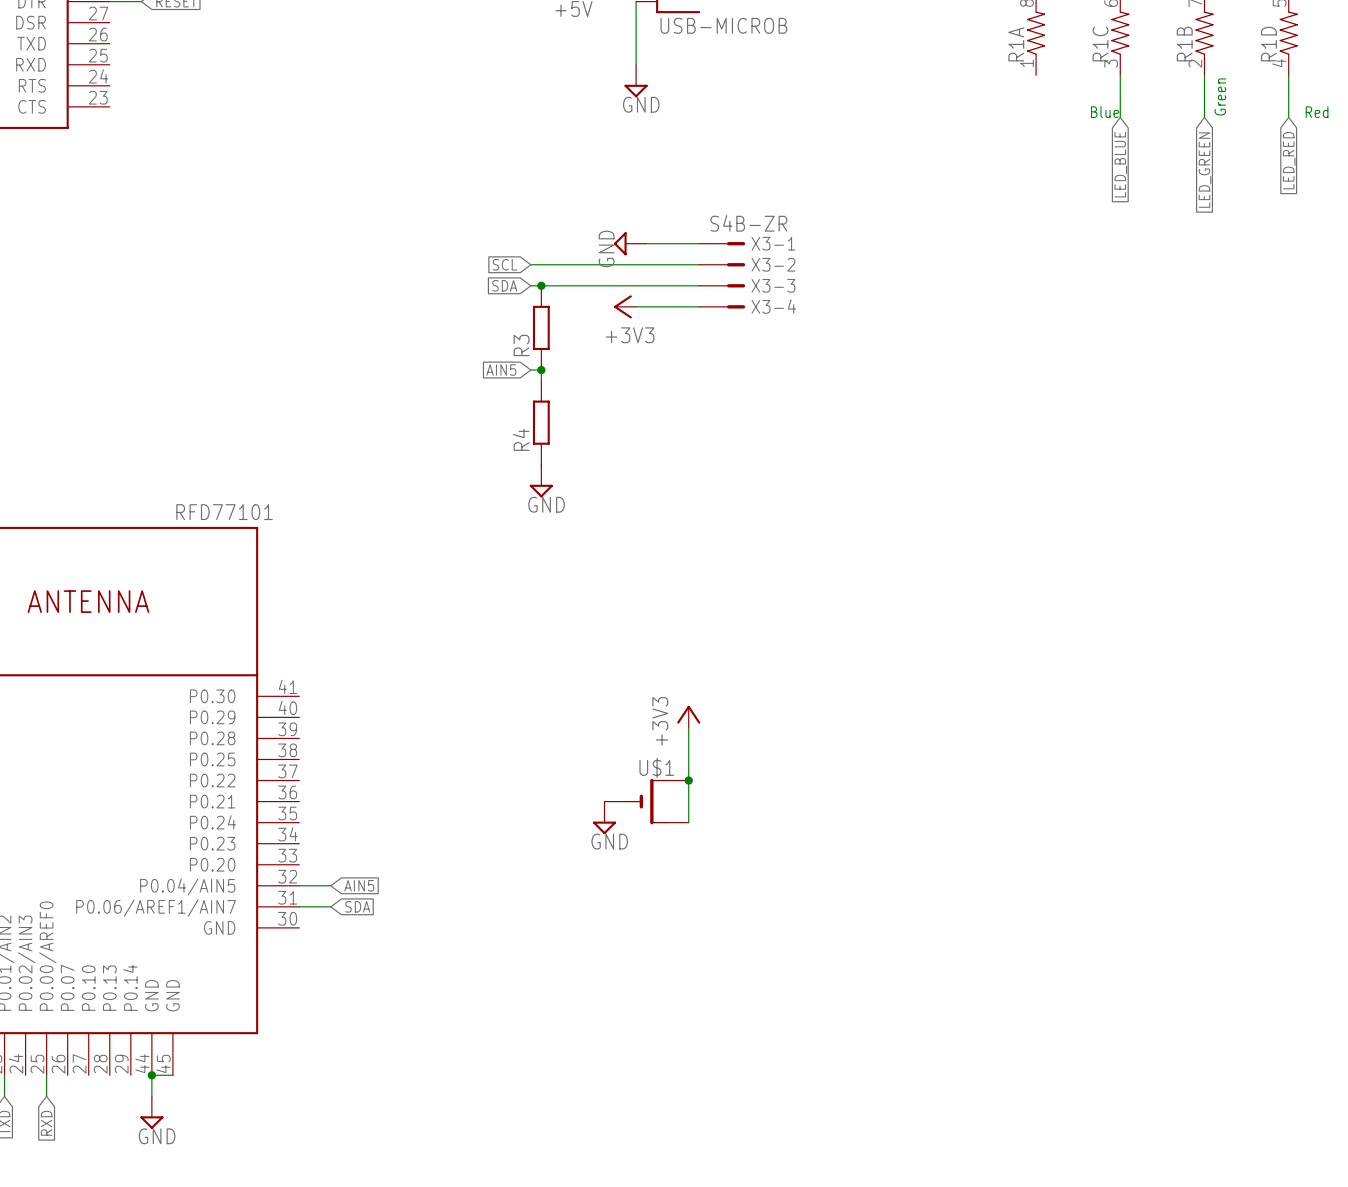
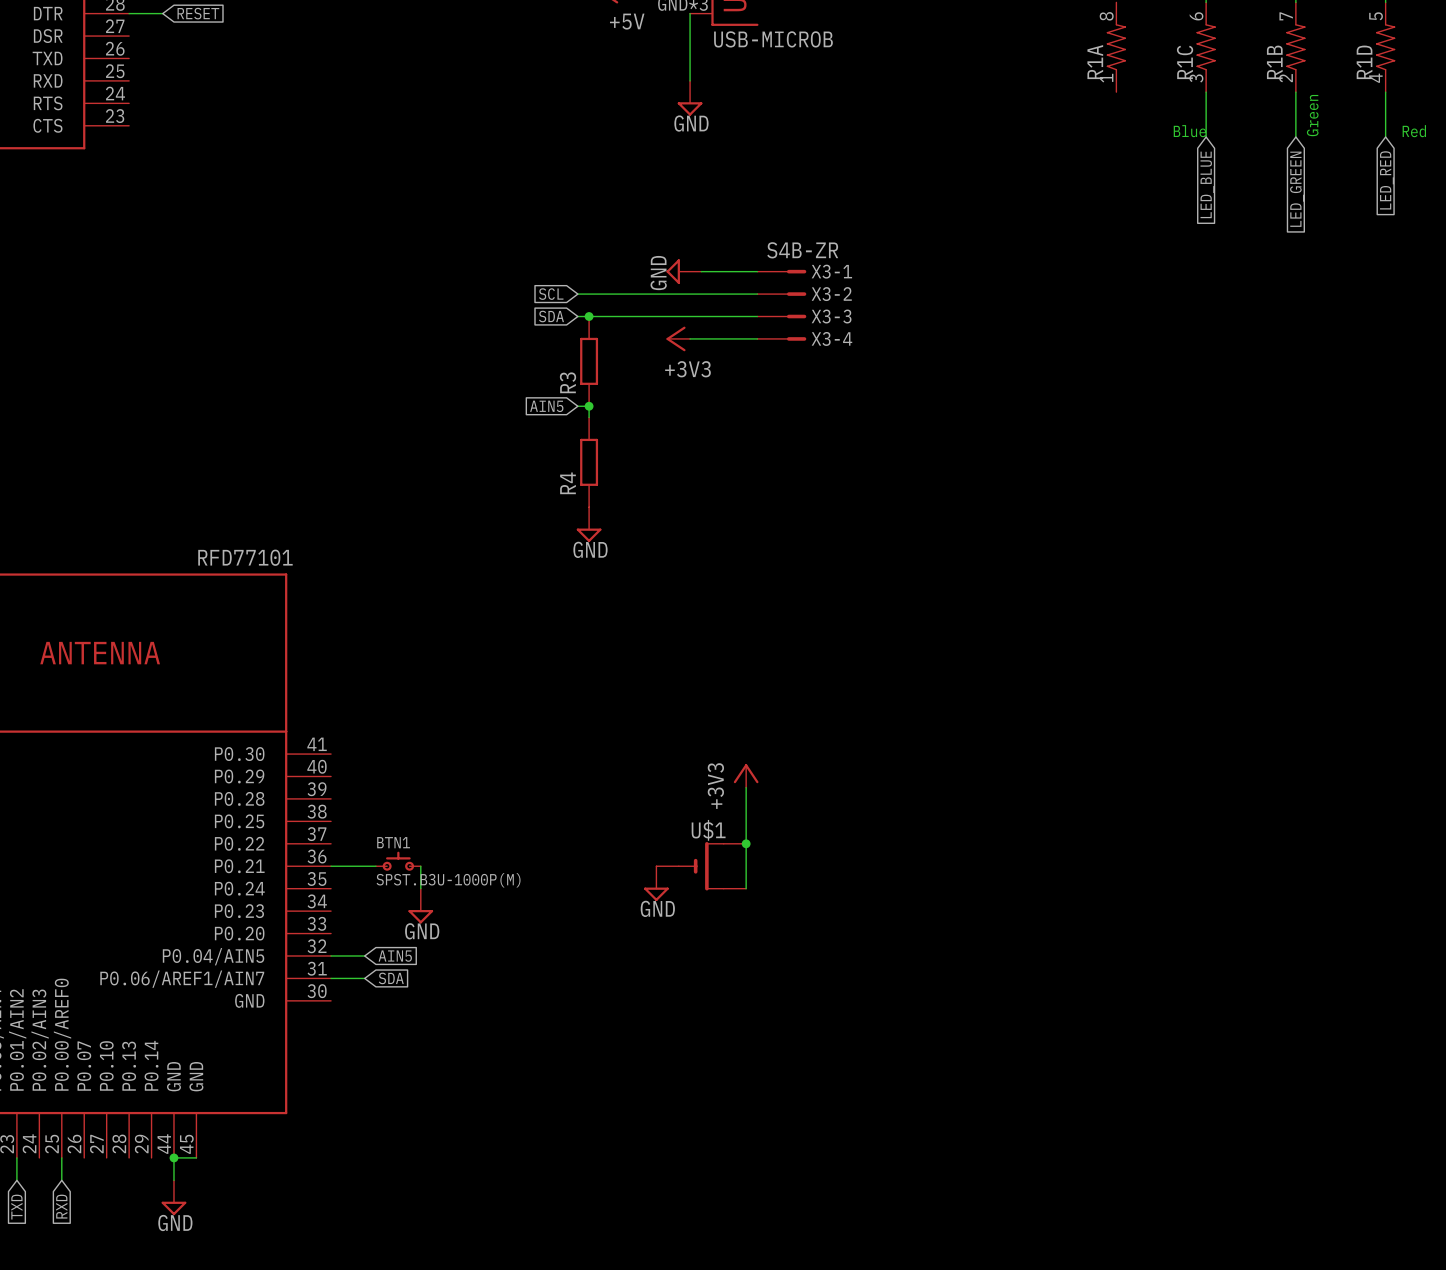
BTN1: none -> SPST.B3U-1000P(M) (398, 861)
wire: none -> (331, 866) (375, 866)
wire: none -> (420, 866) (420, 888)
power symbol: none -> GND (420, 906)

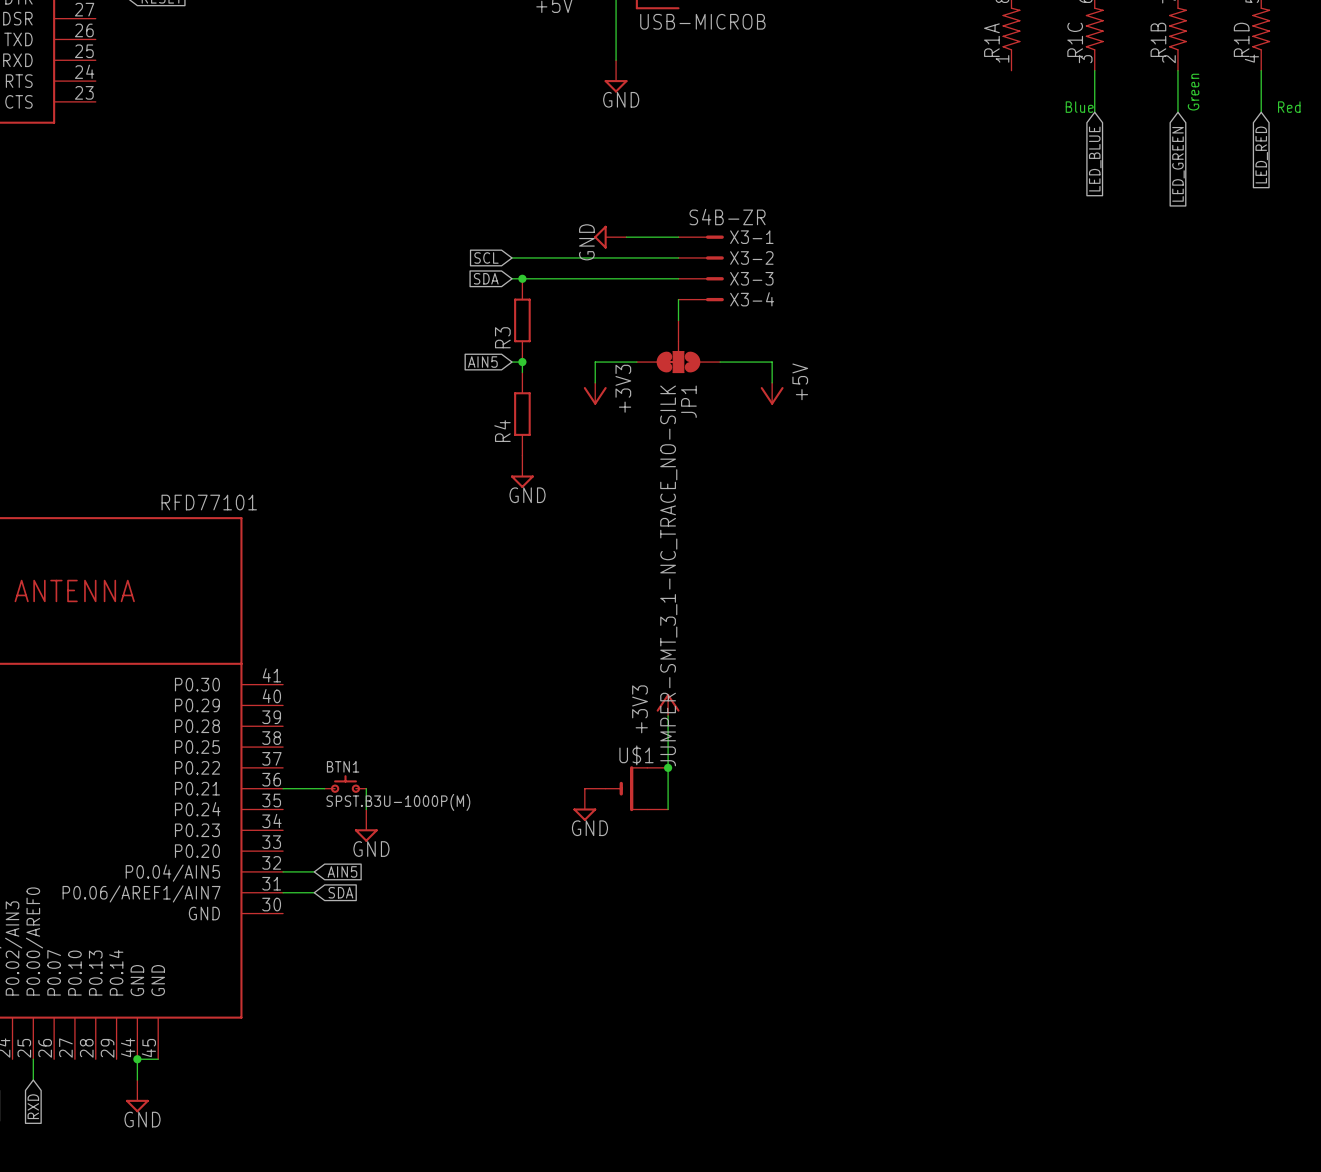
power symbol rotation: 0° (676, 338) -> 90° counterclockwise (595, 395)
power symbol position: +3V3 (678, 338) -> +3V3 (595, 393)
wire: (690, 338) (757, 338) -> (678, 320) (678, 299)
JP1: none -> JUMPER-SMT_3_1-NC_TRACE_NO-SILK (678, 346)
wire: none -> (636, 362) (595, 362) (595, 382)
wire: none -> (720, 362) (772, 362) (772, 382)
power symbol: none -> +5V (772, 393)

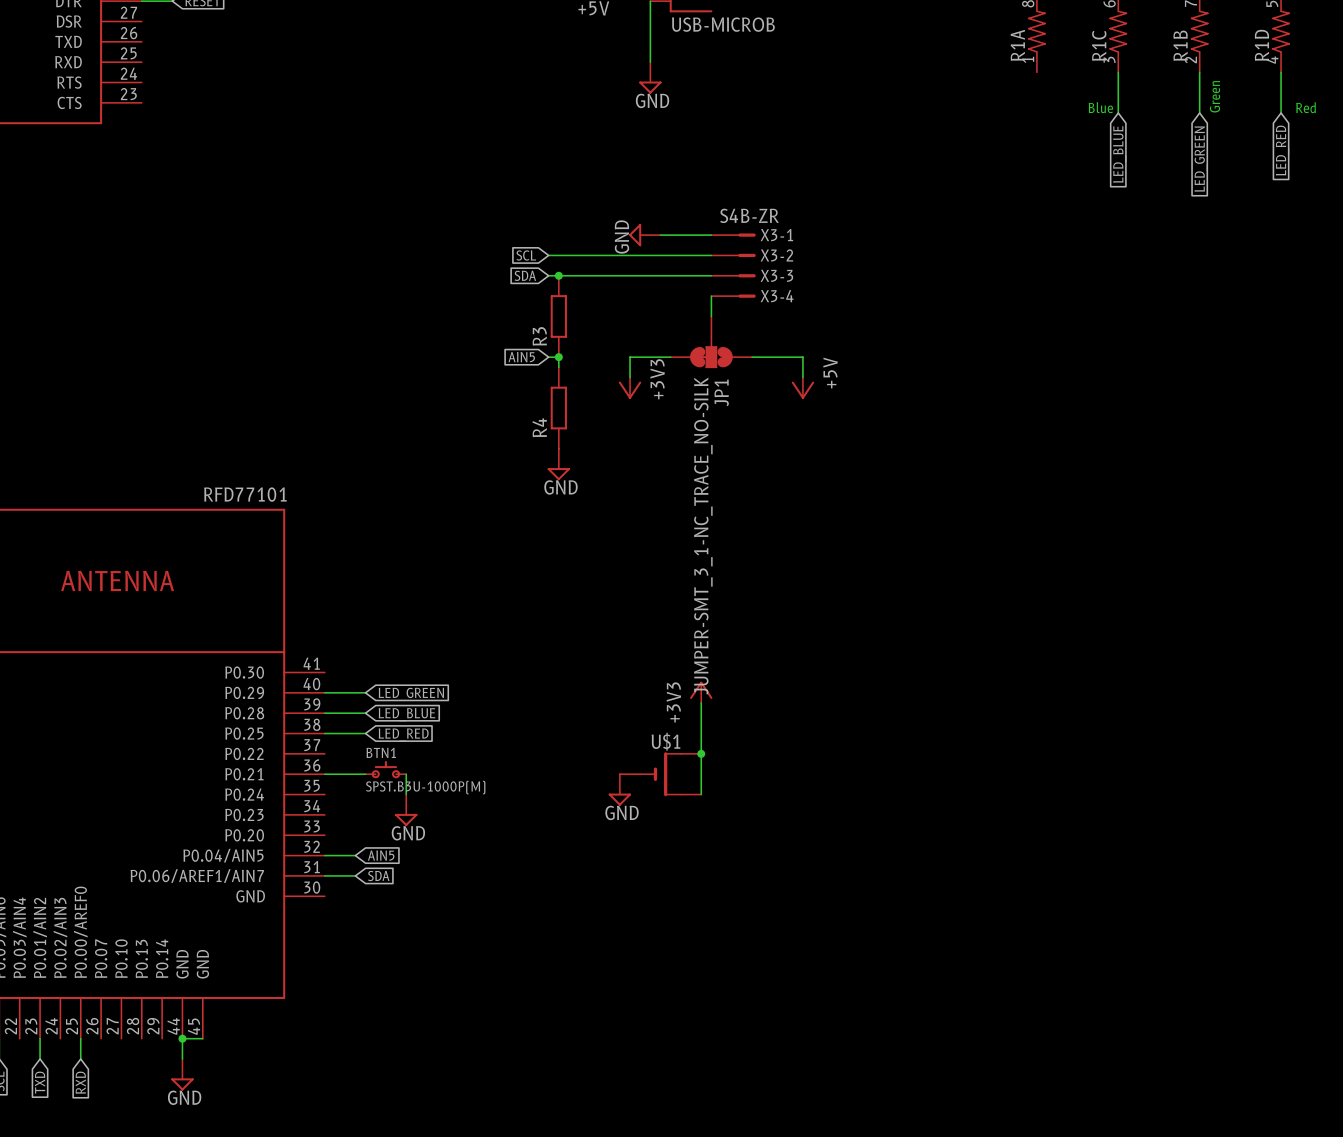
wire: none -> (324, 692) (365, 692)
global label: none -> LED_GREEN (411, 694)
wire: none -> (324, 713) (365, 713)
global label: none -> LED_BLUE (406, 714)
wire: none -> (324, 733) (365, 733)
global label: none -> LED_RED (403, 735)

